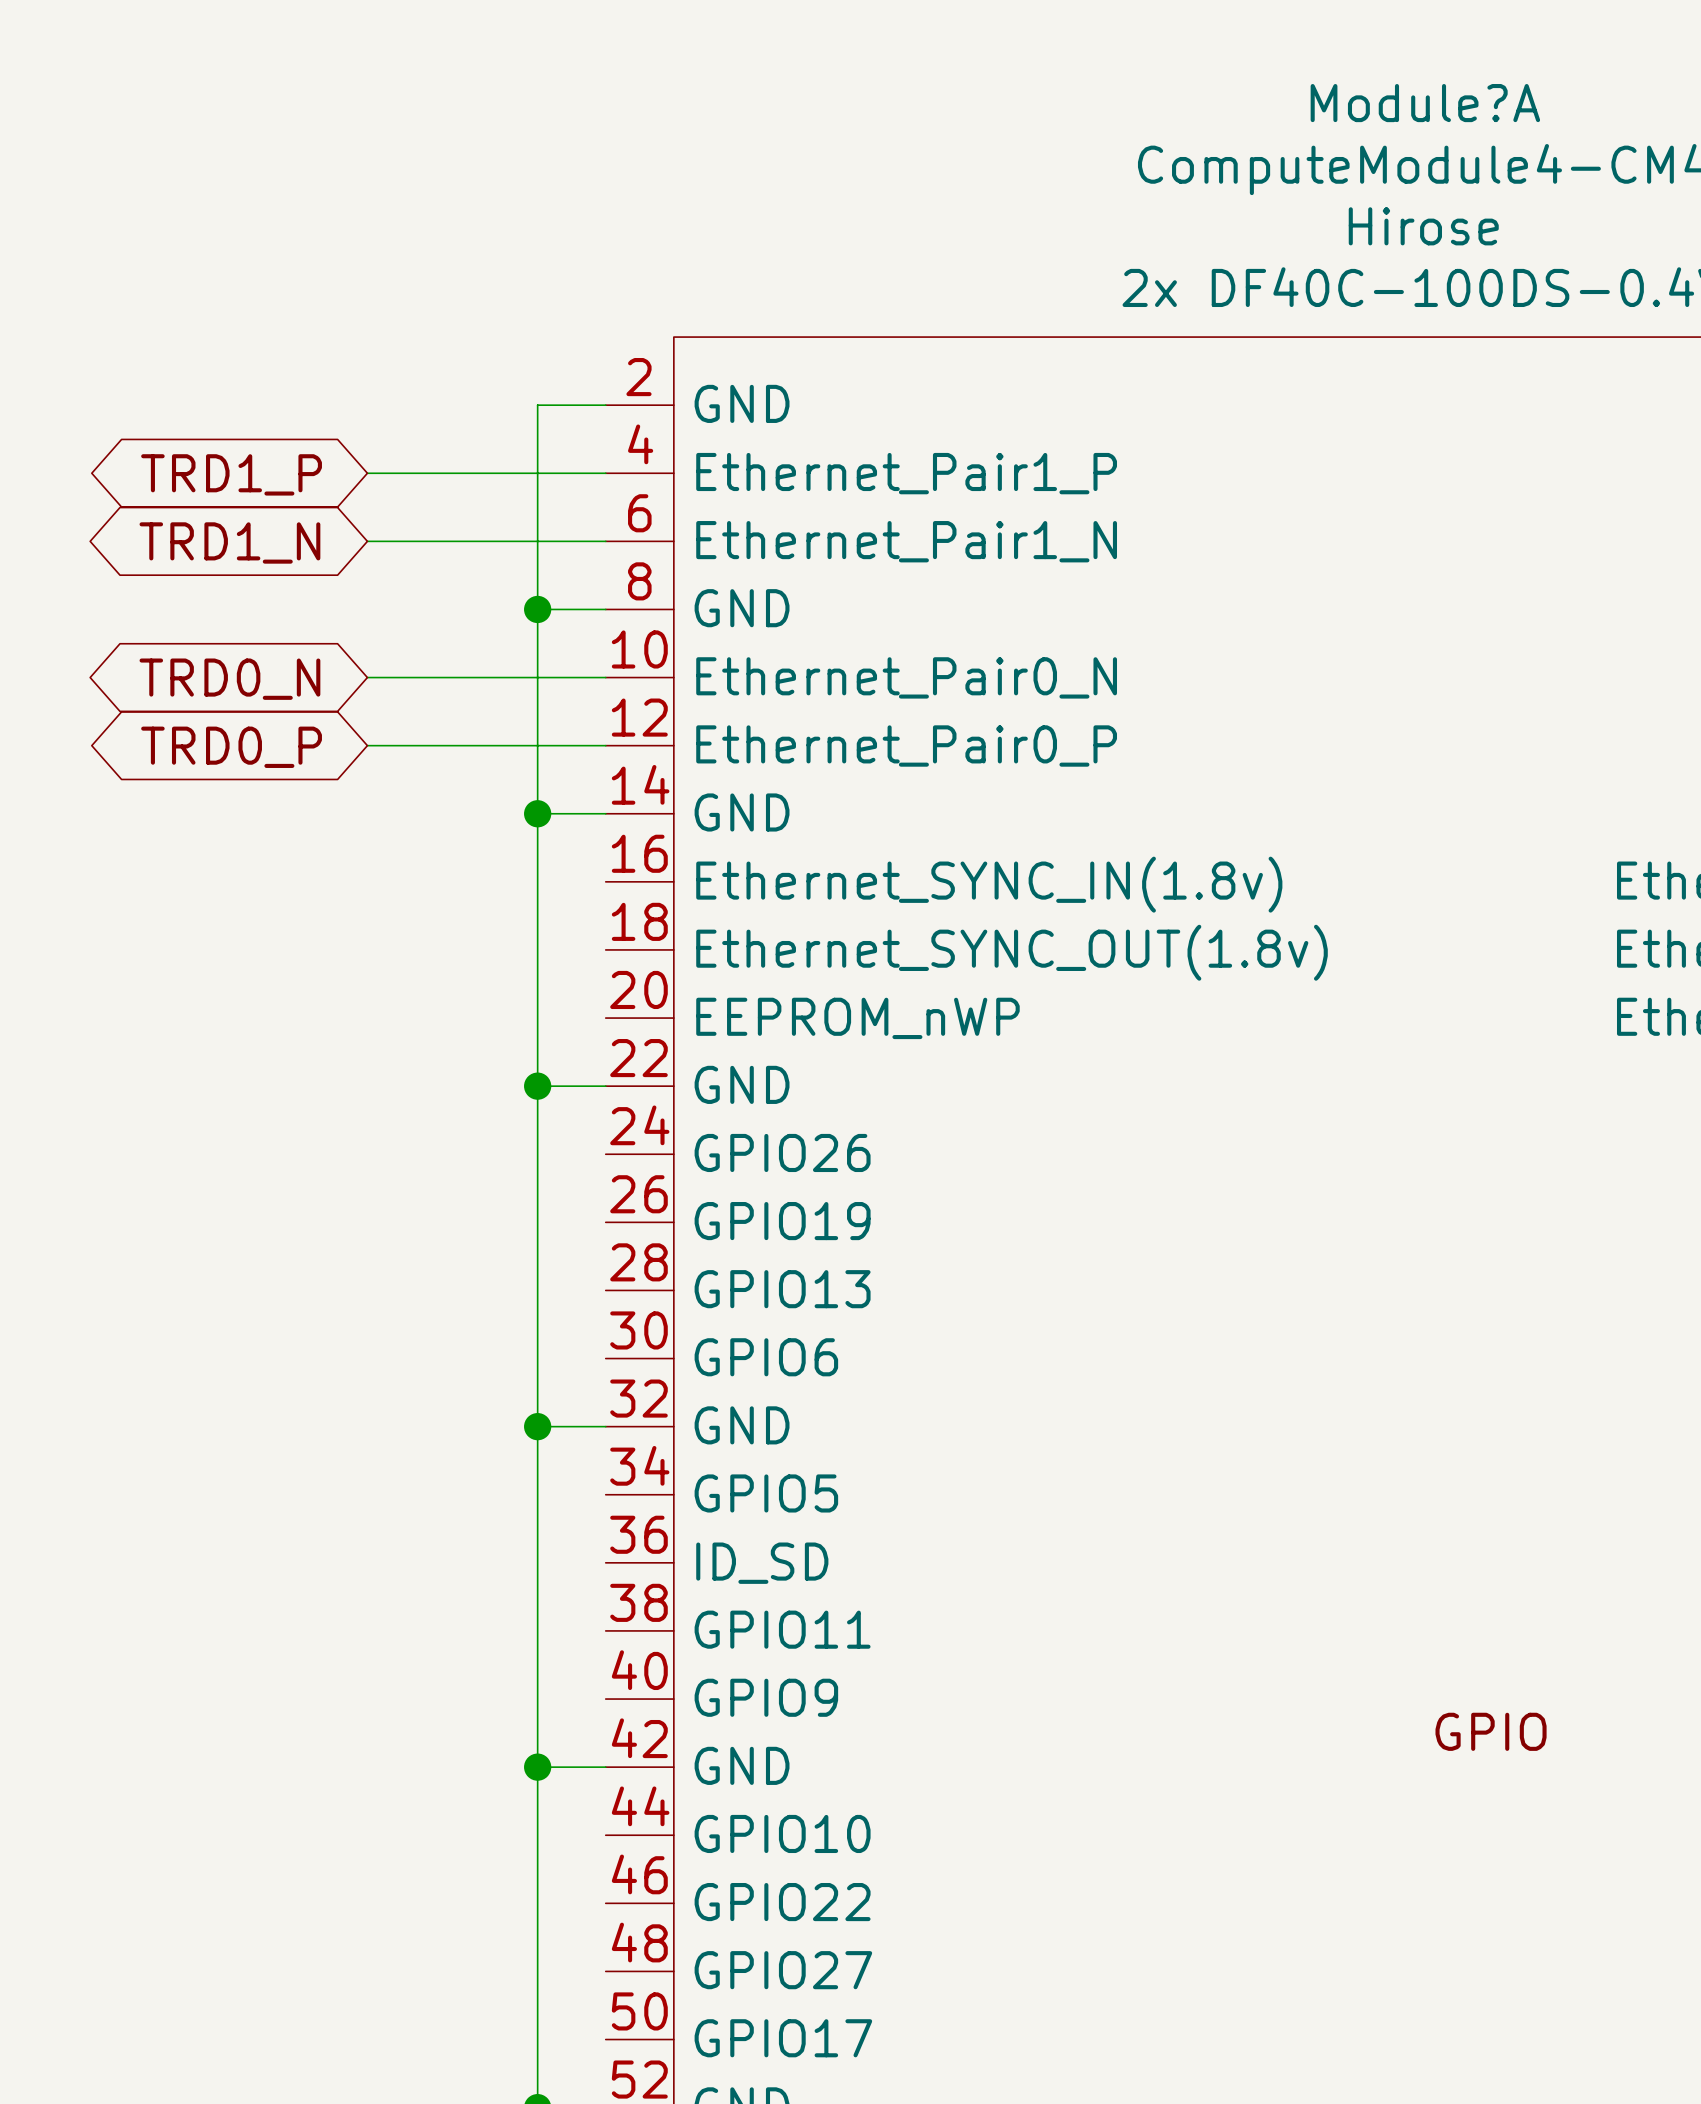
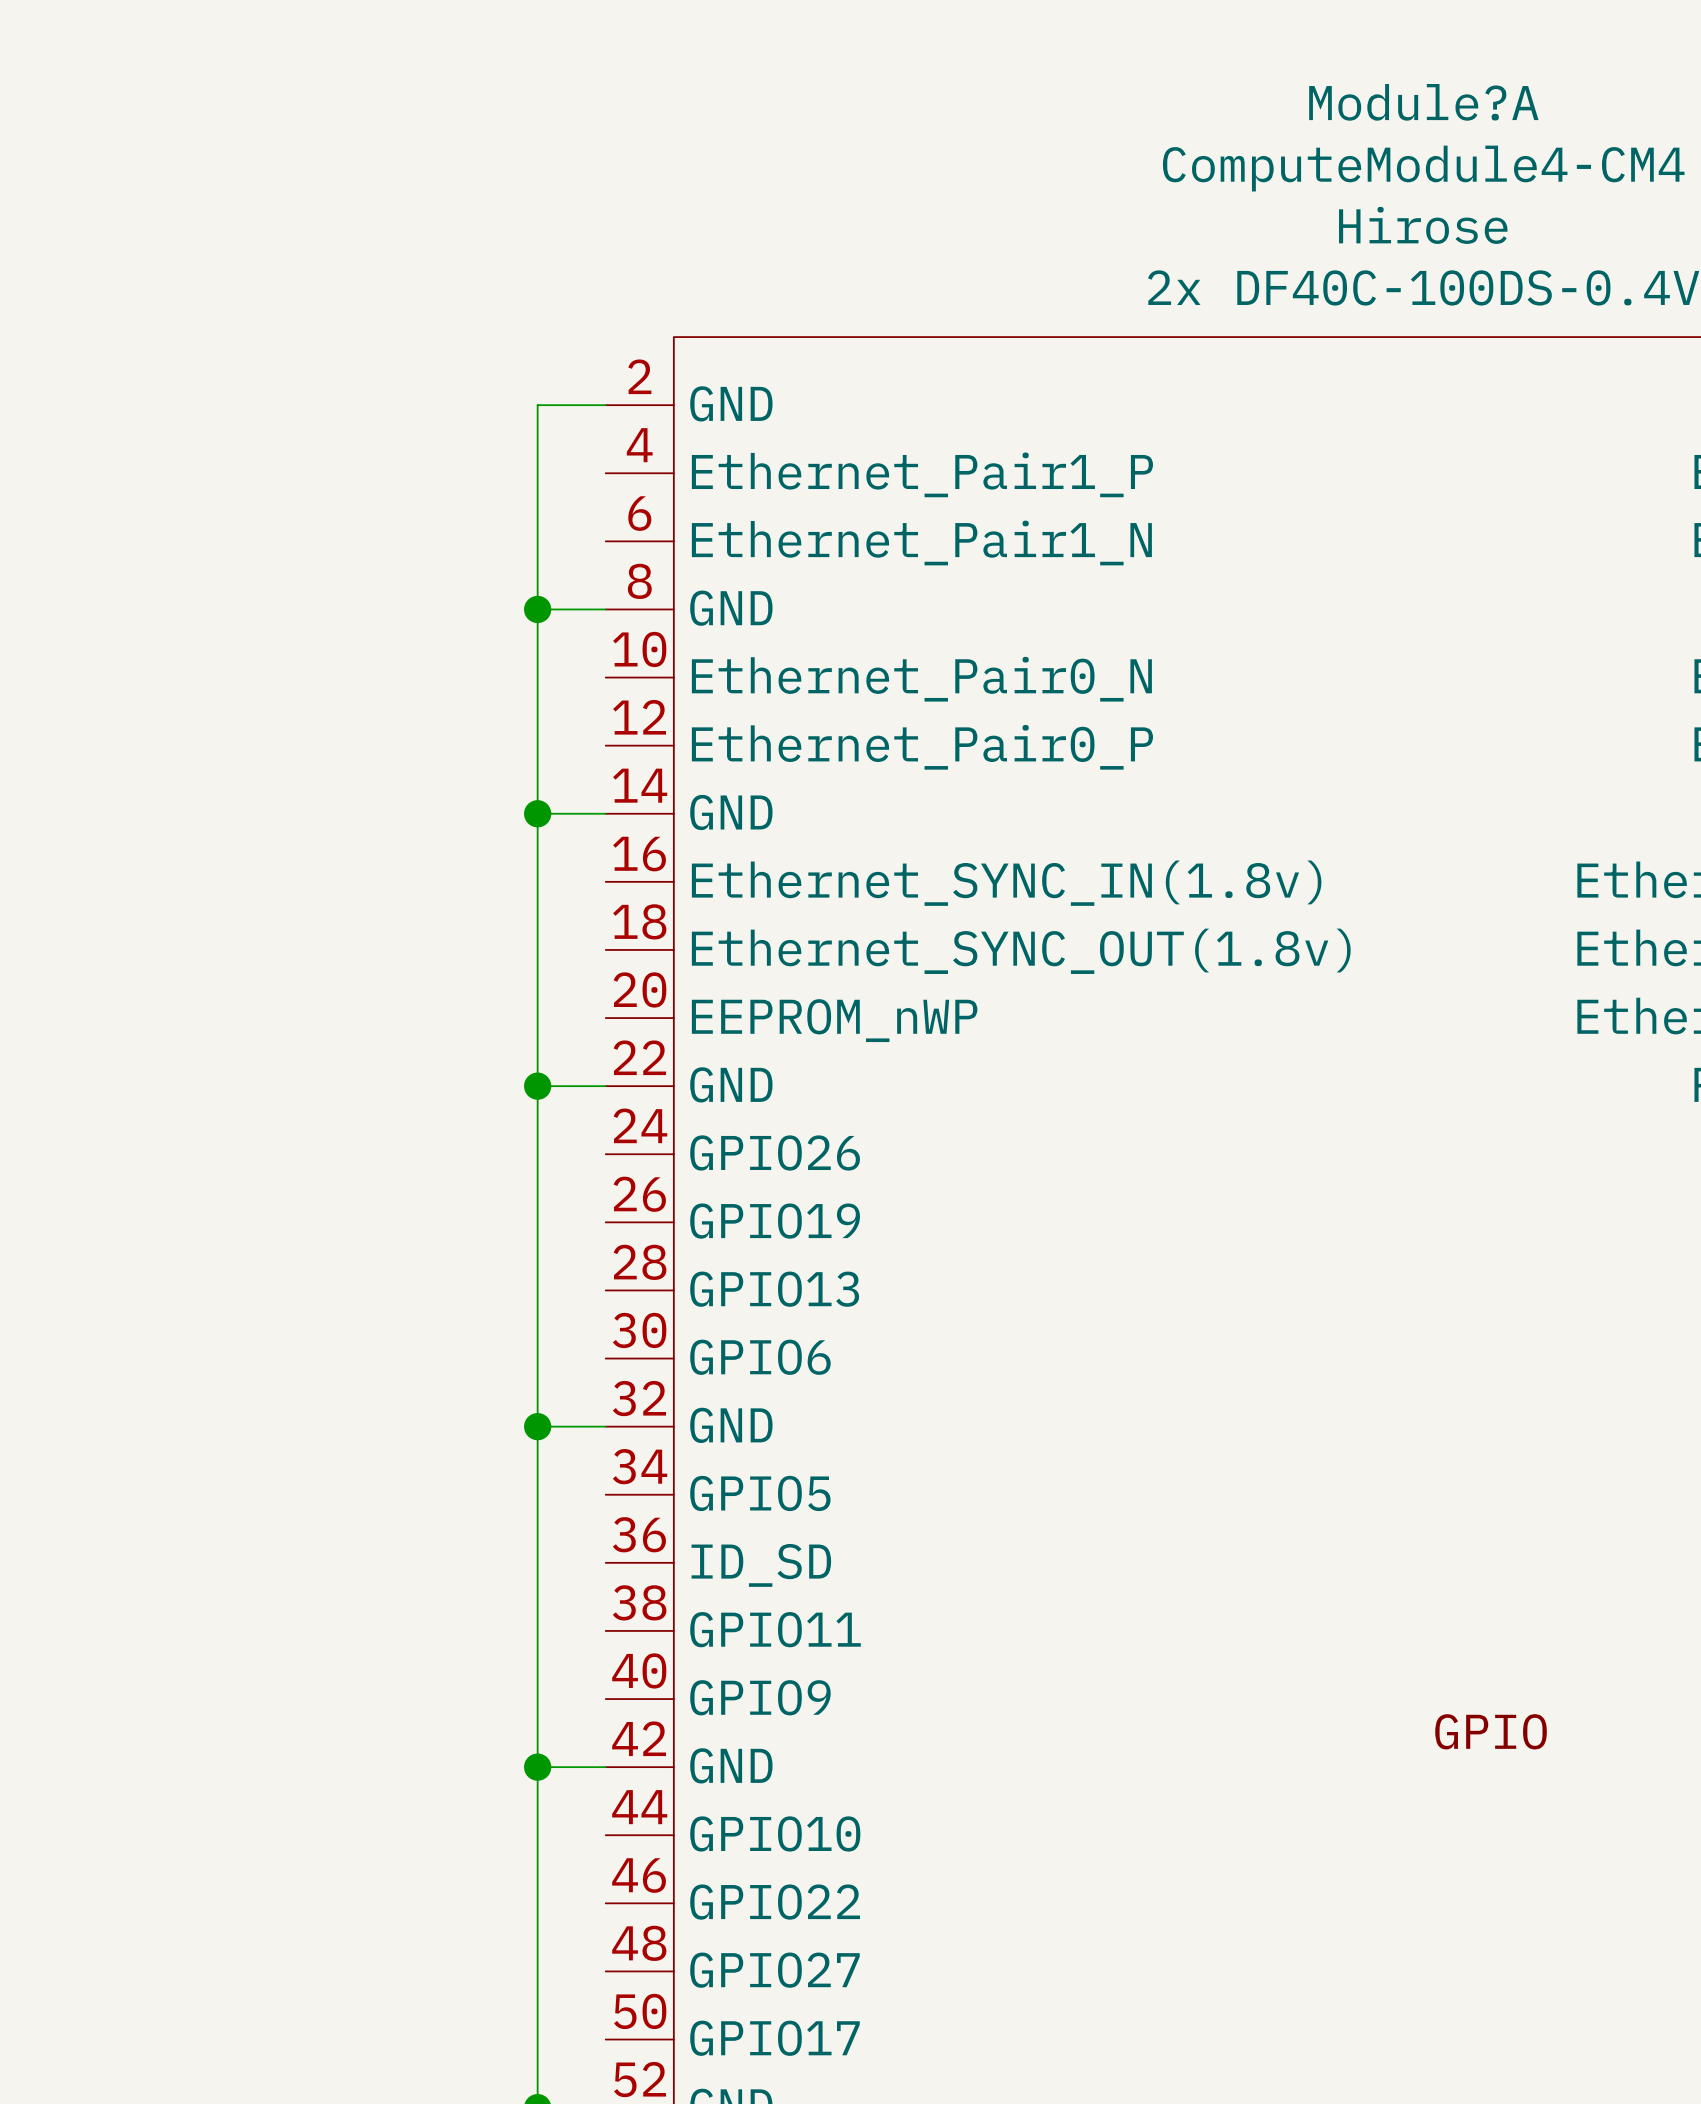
wire: (367, 473) (605, 473) -> none
global label: TRD1_P (231, 474) -> none
wire: (367, 541) (605, 541) -> none
global label: TRD1_N (229, 542) -> none
wire: (367, 677) (605, 677) -> none
global label: TRD0_N (229, 679) -> none
wire: (367, 745) (605, 745) -> none
global label: TRD0_P (231, 747) -> none

